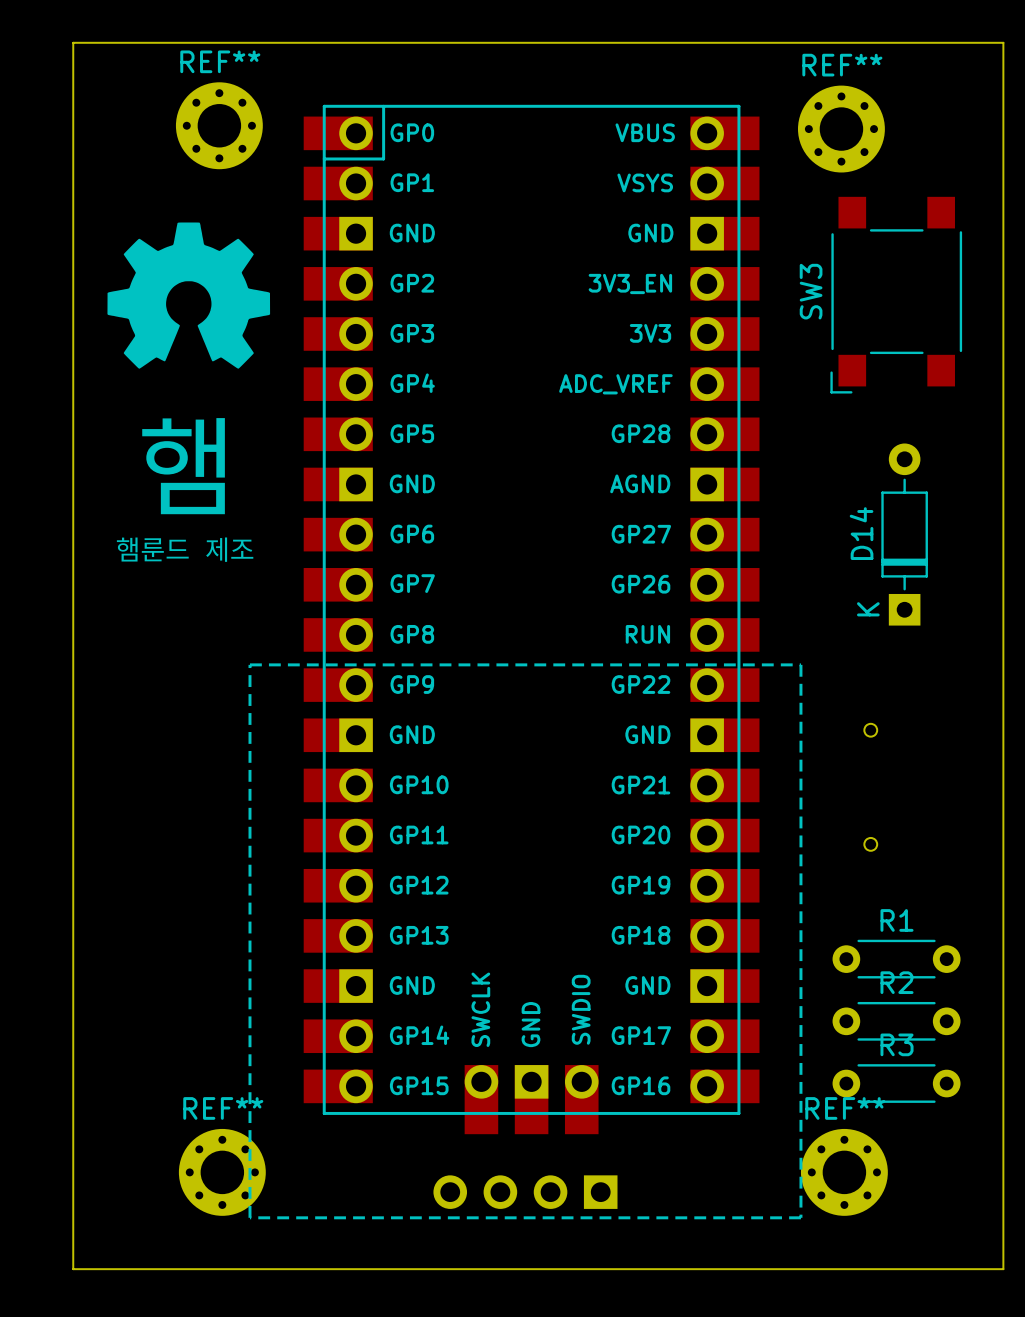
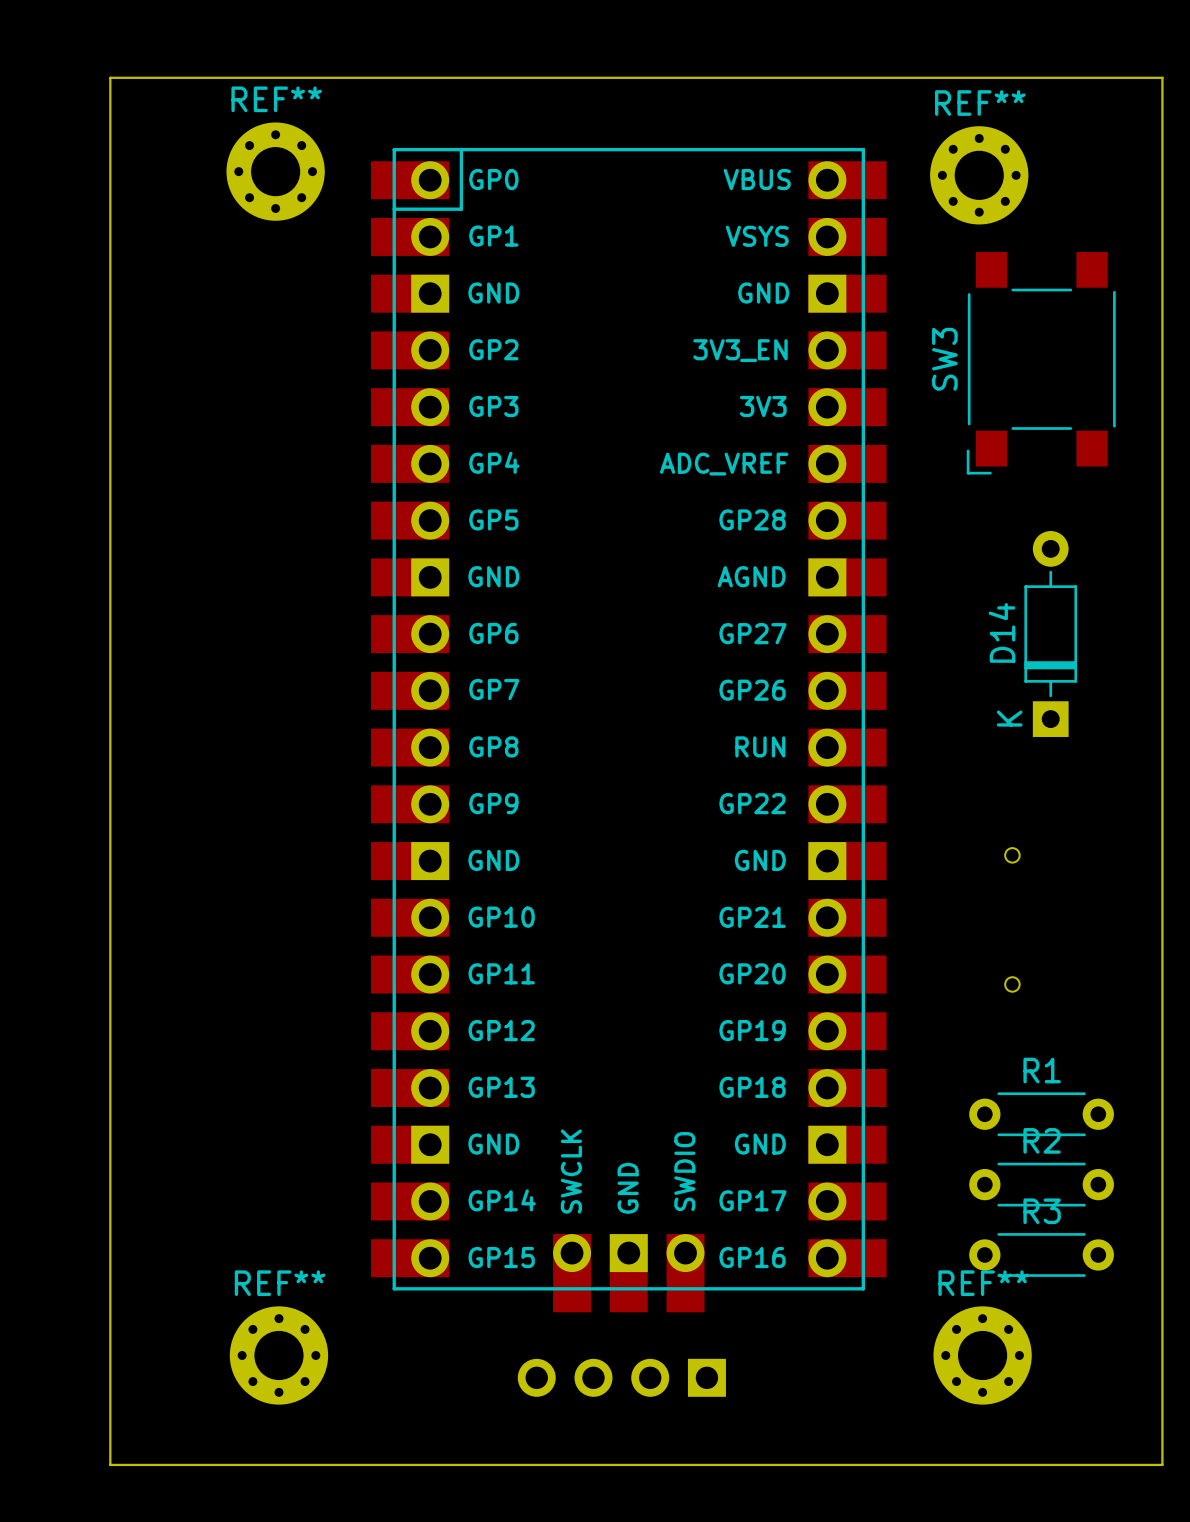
drawing: [107, 222, 271, 369] -> none
text: 햄 (183, 466) -> none
text: 햄룬드 제조 (185, 549) -> none
line: (249, 664) (800, 664) (800, 1217) (249, 1217) (249, 664) -> none

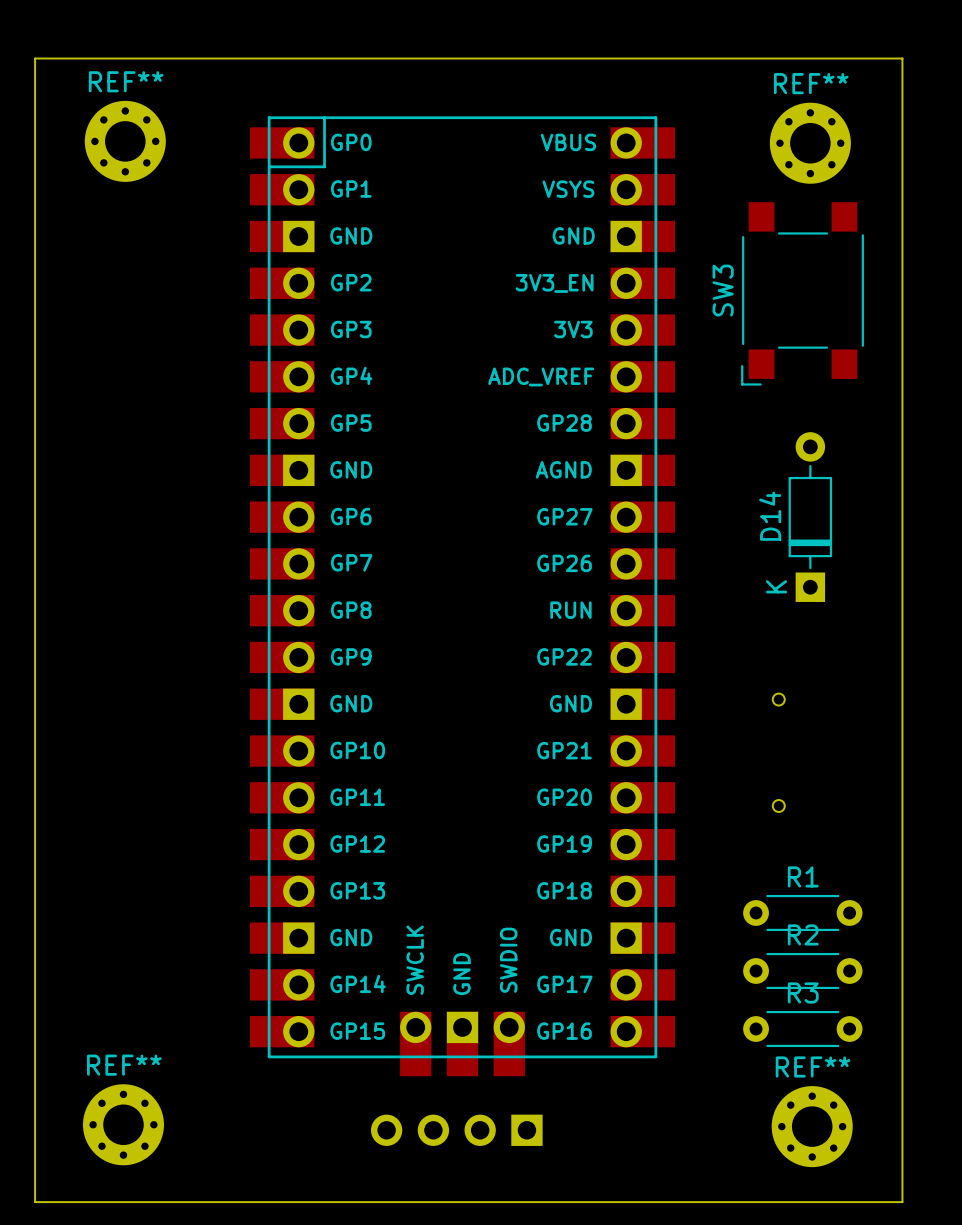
REF** position: (275, 171) -> (125, 141)
REF** position: (979, 175) -> (810, 143)
REF** position: (278, 1355) -> (123, 1124)
REF** position: (982, 1355) -> (812, 1126)

